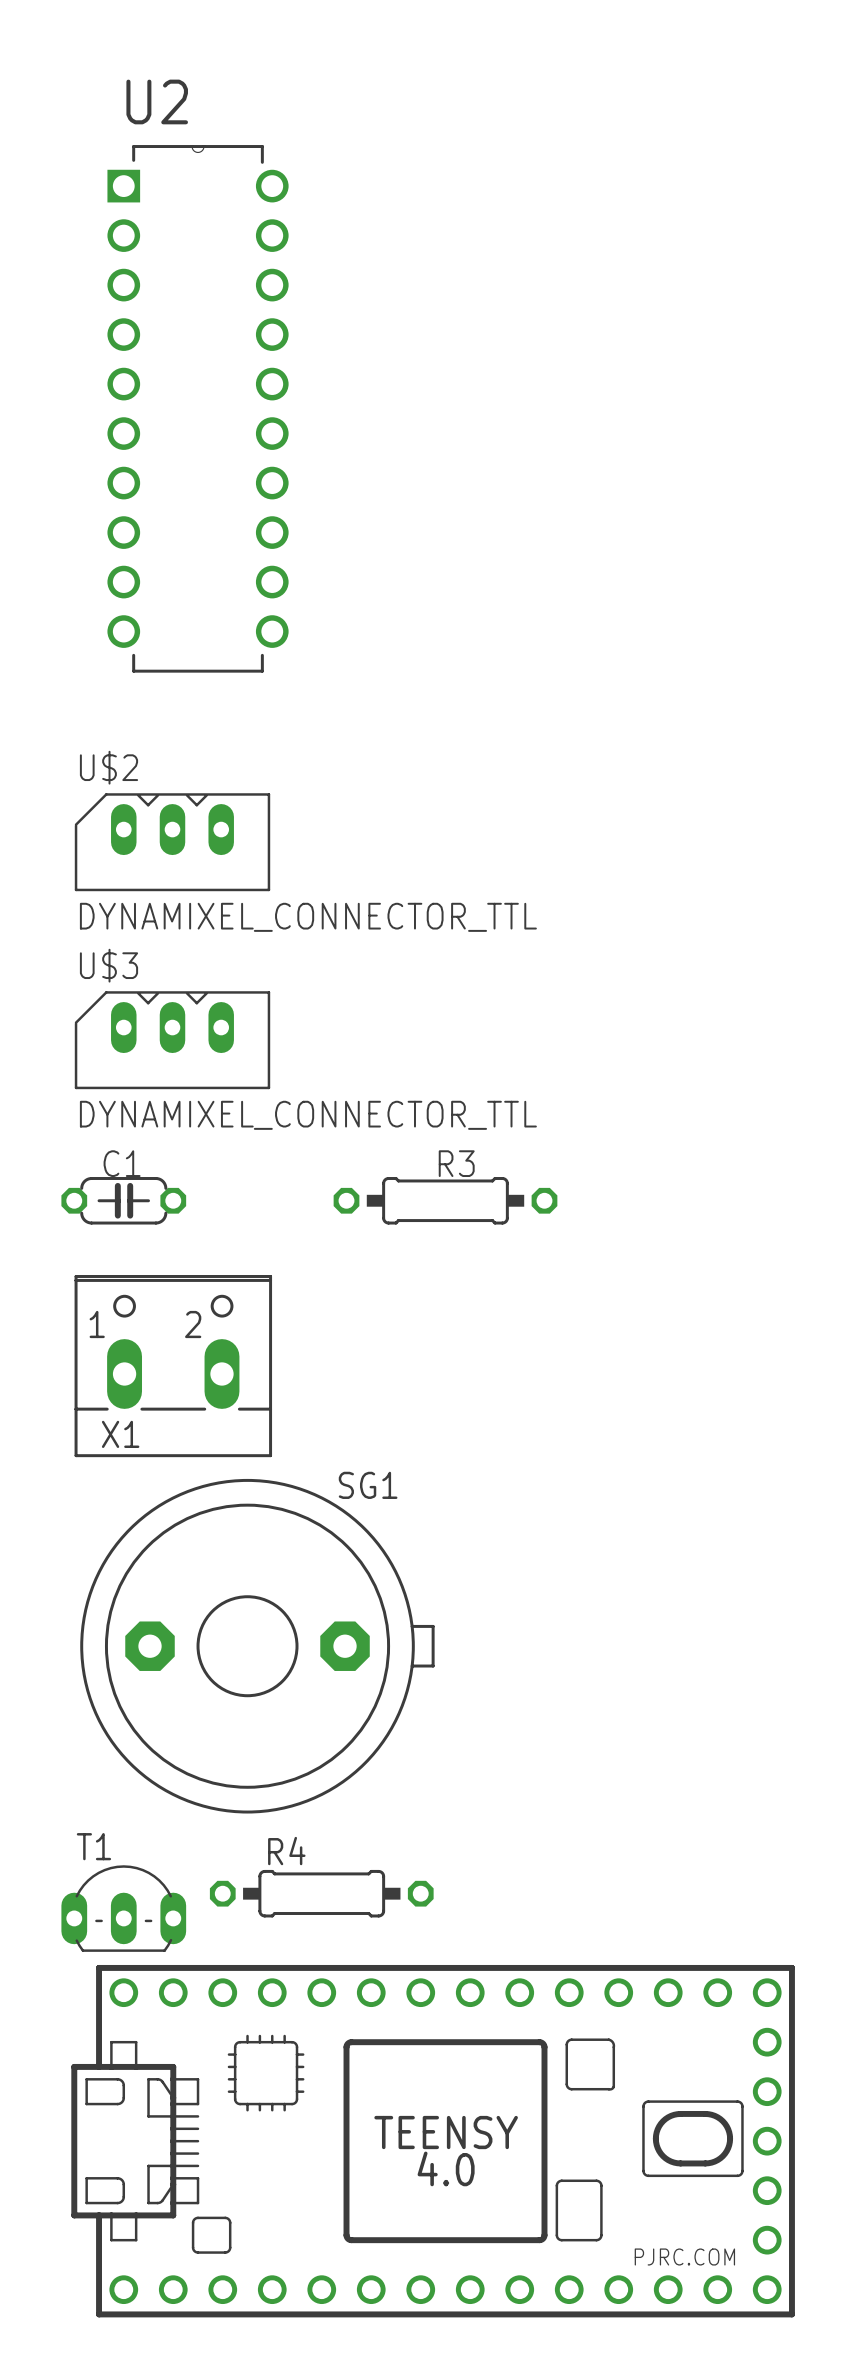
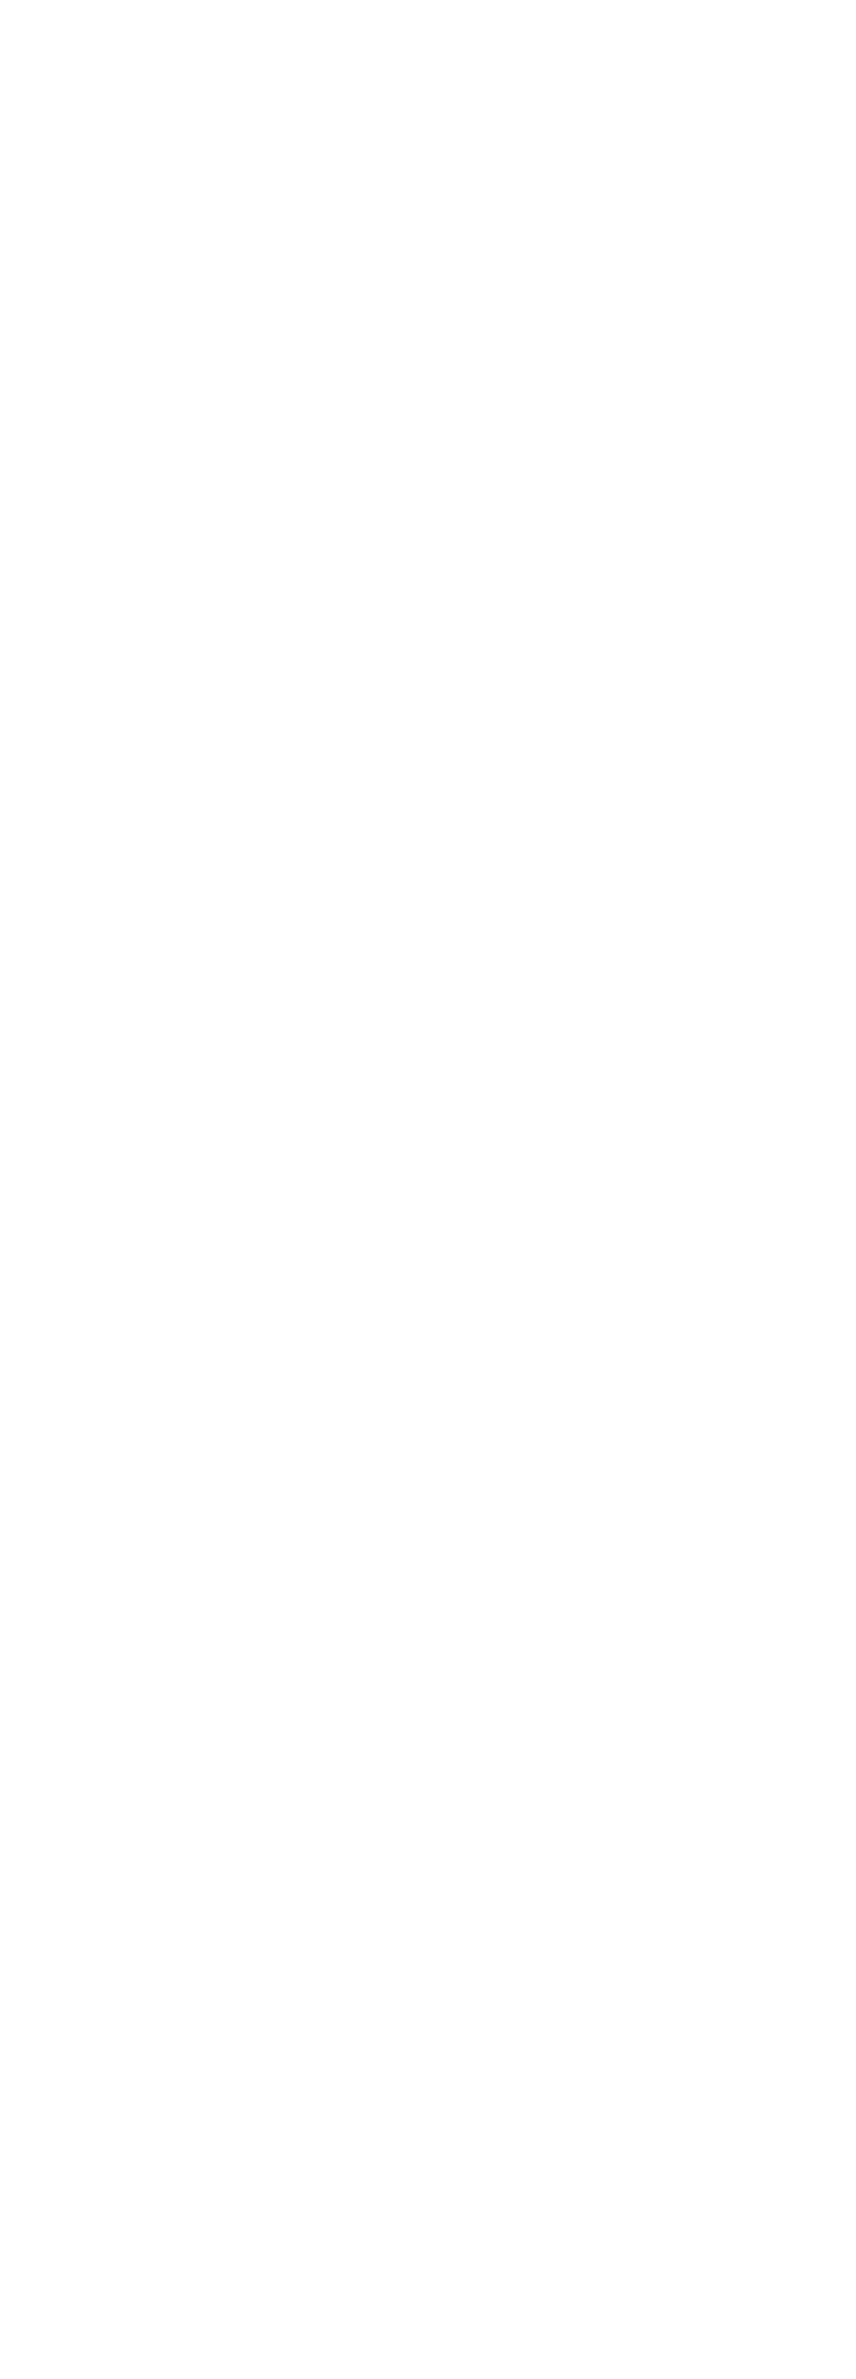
U2: (198, 408) -> none
U$2: DYNAMIXEL_CONNECTOR_TTL (172, 842) -> none
U$3: DYNAMIXEL_CONNECTOR_TTL (172, 1040) -> none
C1: (123, 1200) -> none
R3: (445, 1200) -> none
X1: (173, 1366) -> none
SG1: (257, 1646) -> none
R4: (321, 1893) -> none
T1: (123, 1908) -> none
part: (433, 2141) -> none

